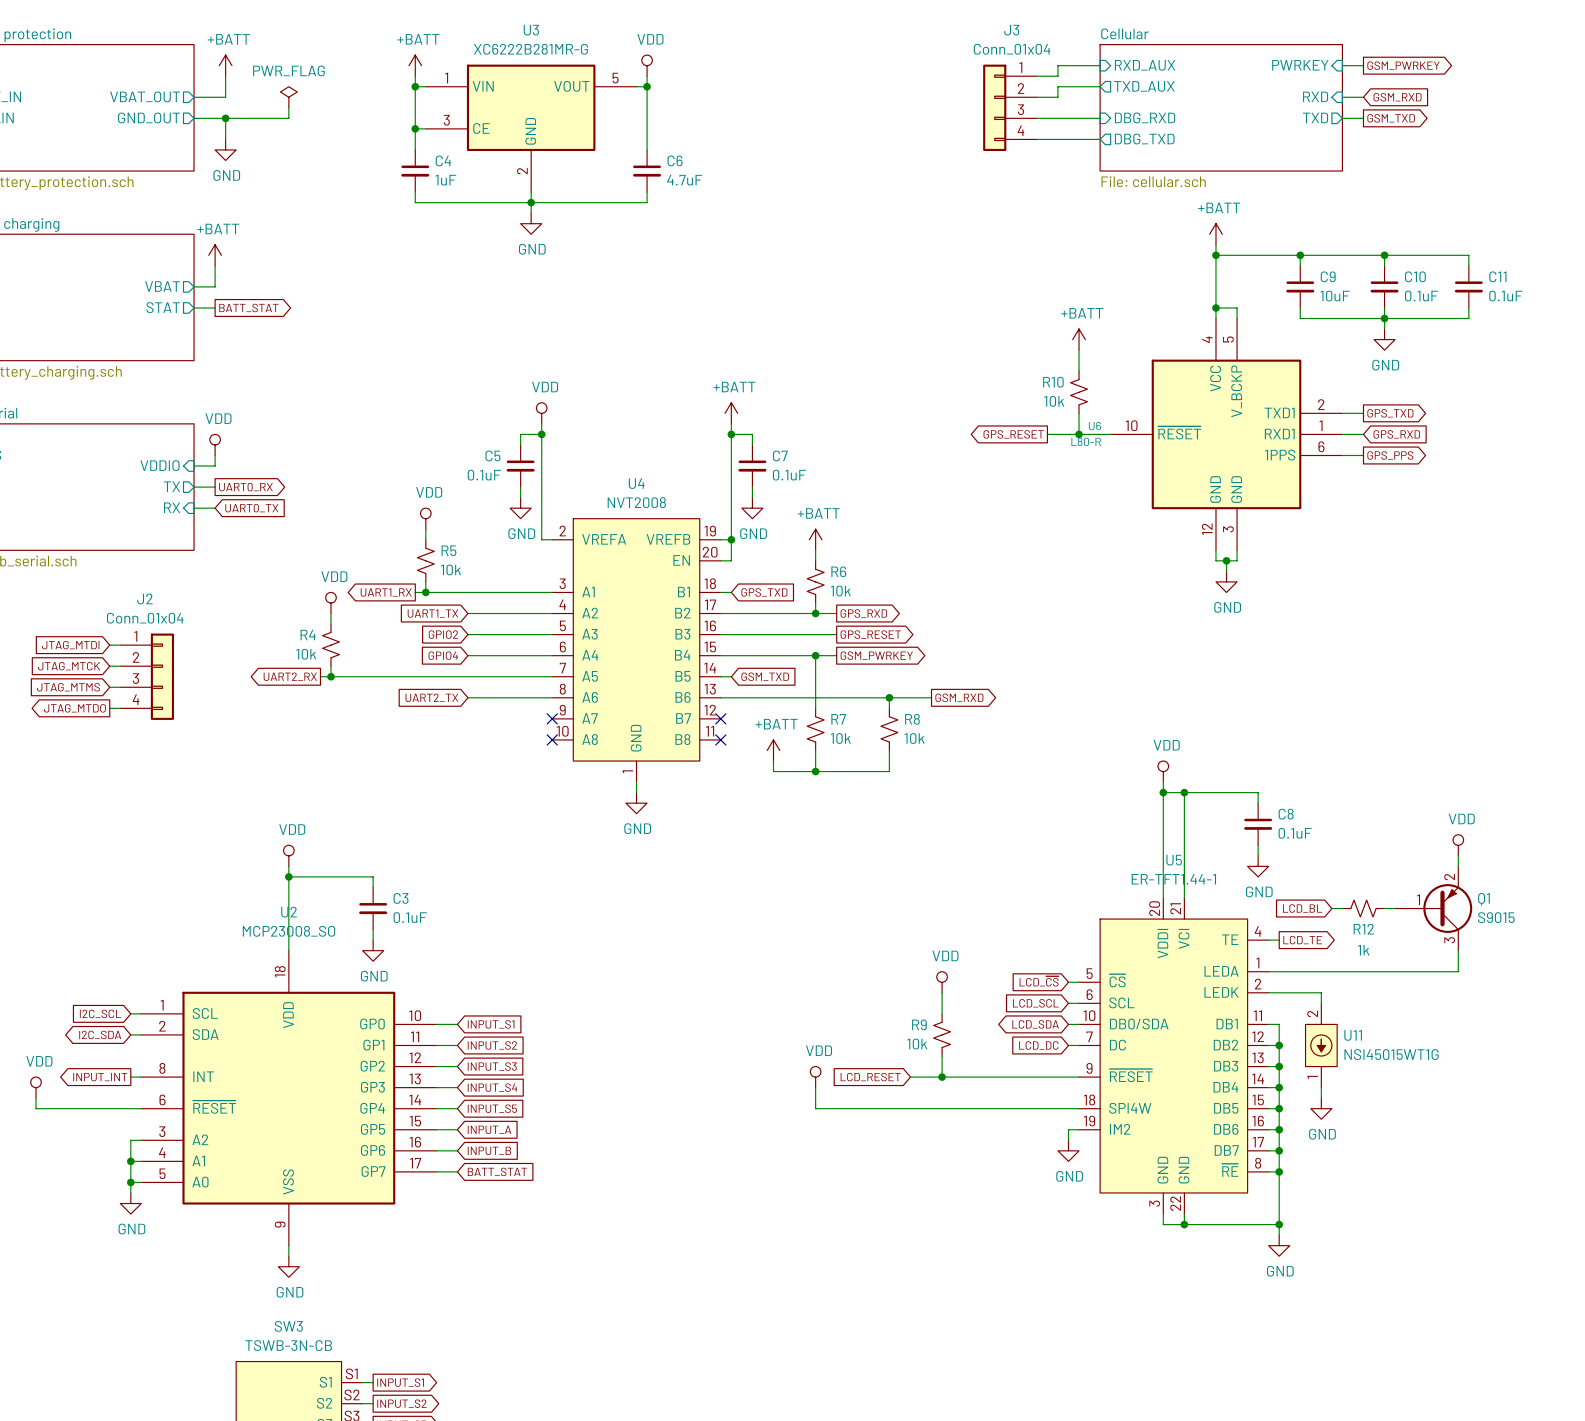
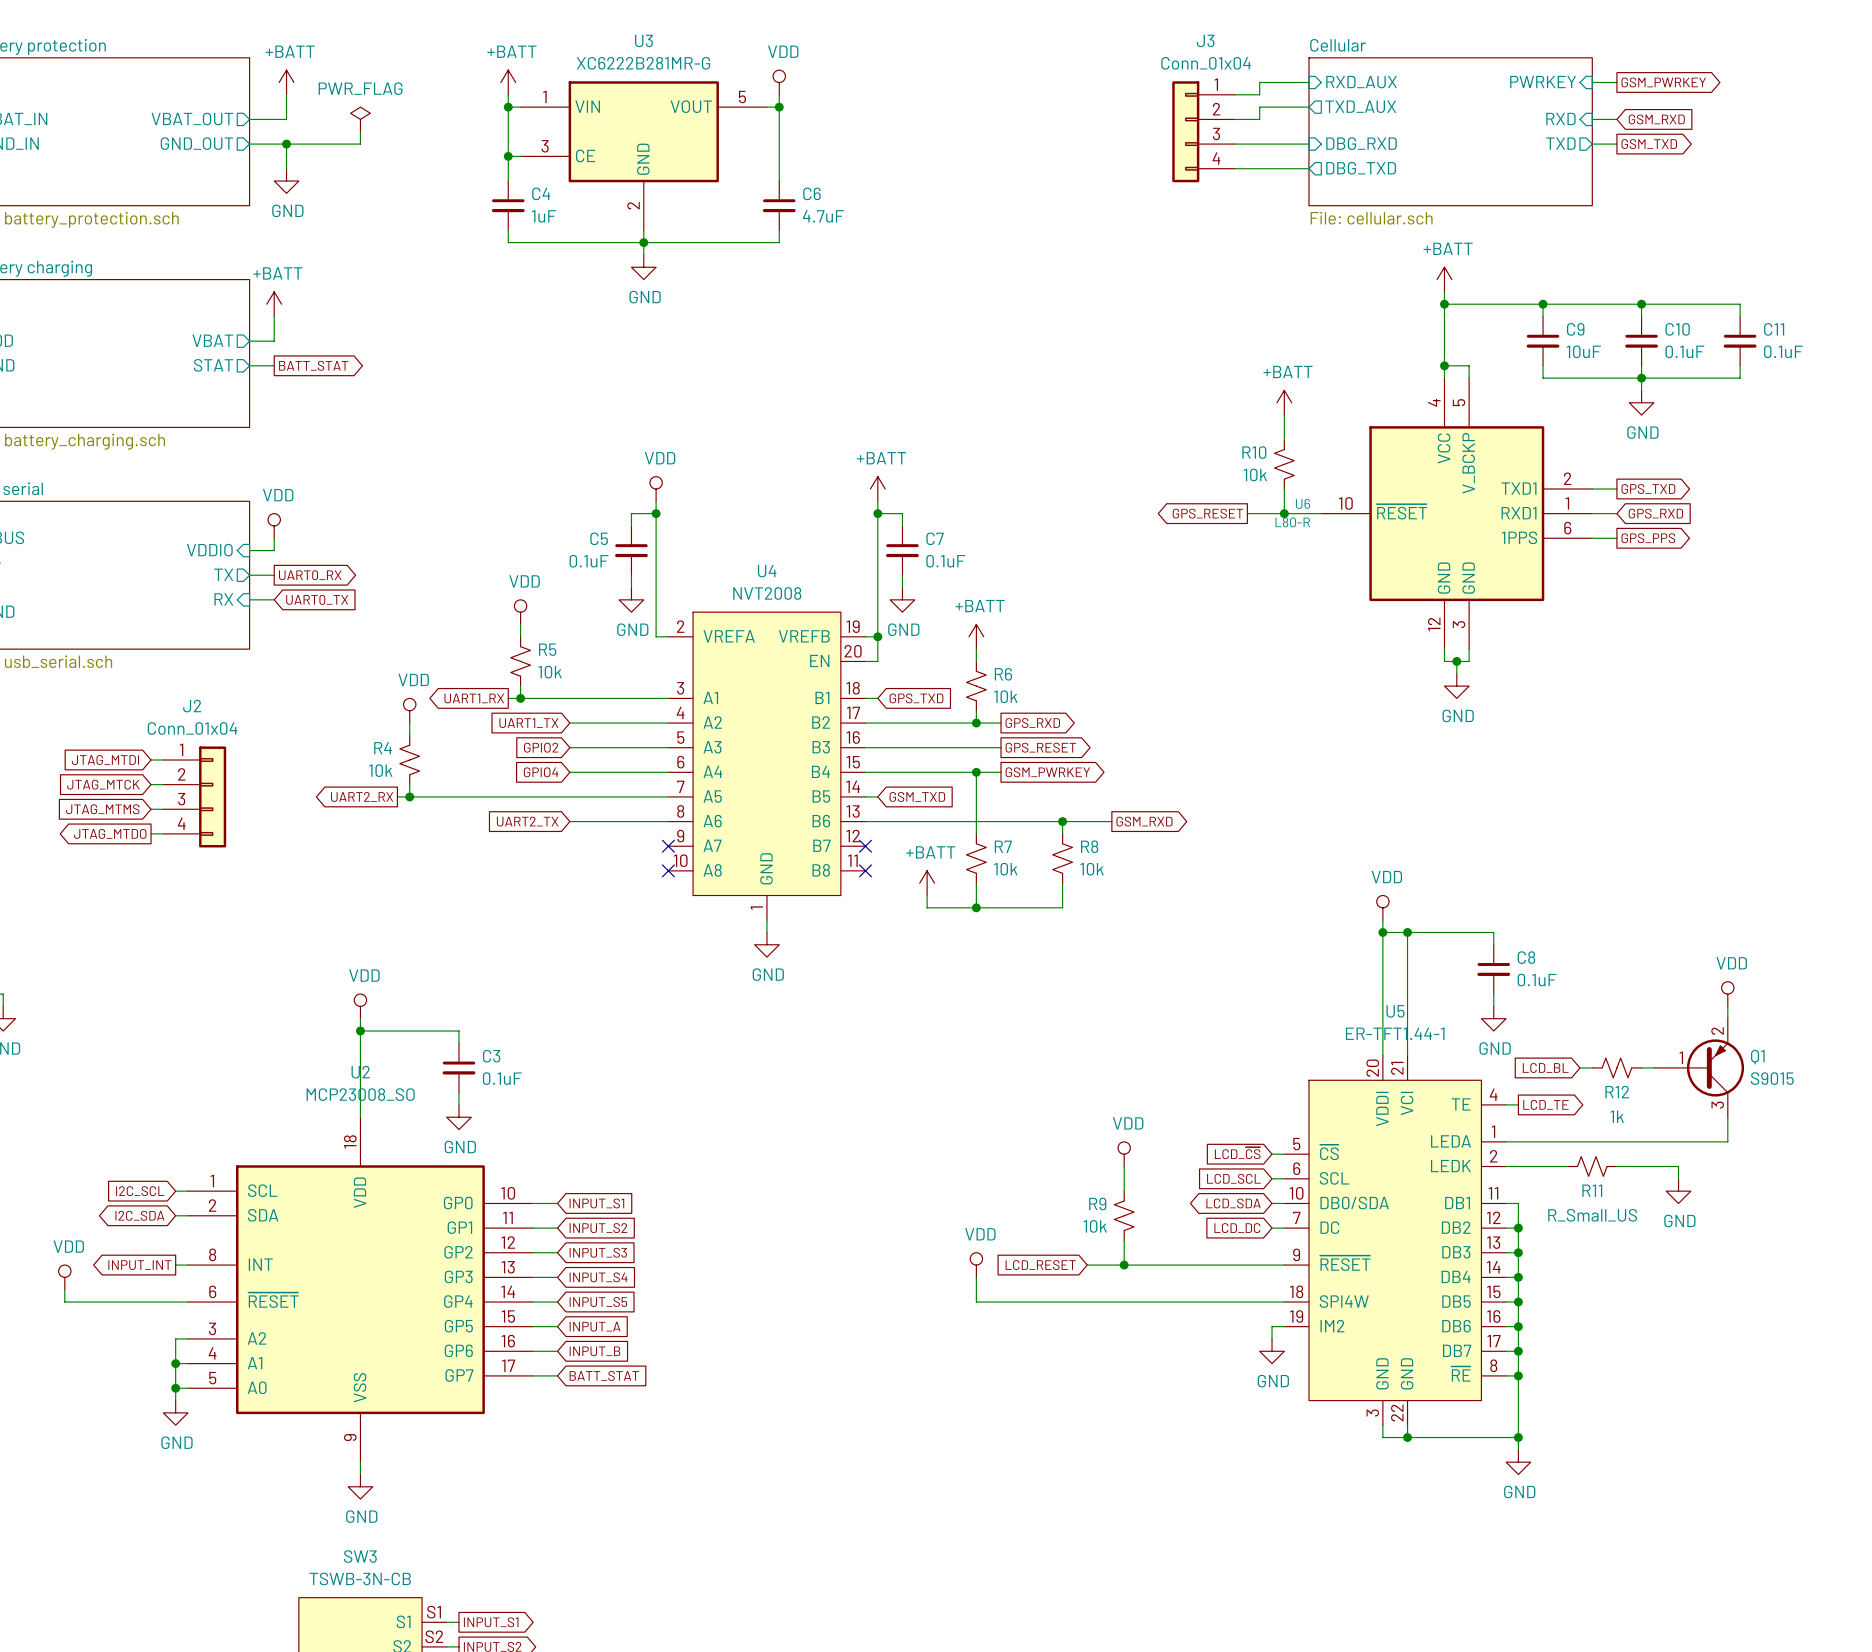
wire: (1321, 992) (1321, 1003) -> none
R11: none -> R_Small_US (1592, 1166)
wire: none -> (1616, 1166) (1678, 1166) (1678, 1178)
U11: NSI45015WT1G (1321, 1045) -> none
wire: (1321, 1087) (1321, 1098) -> none
power symbol position: GND (1321, 1108) -> GND (1678, 1191)

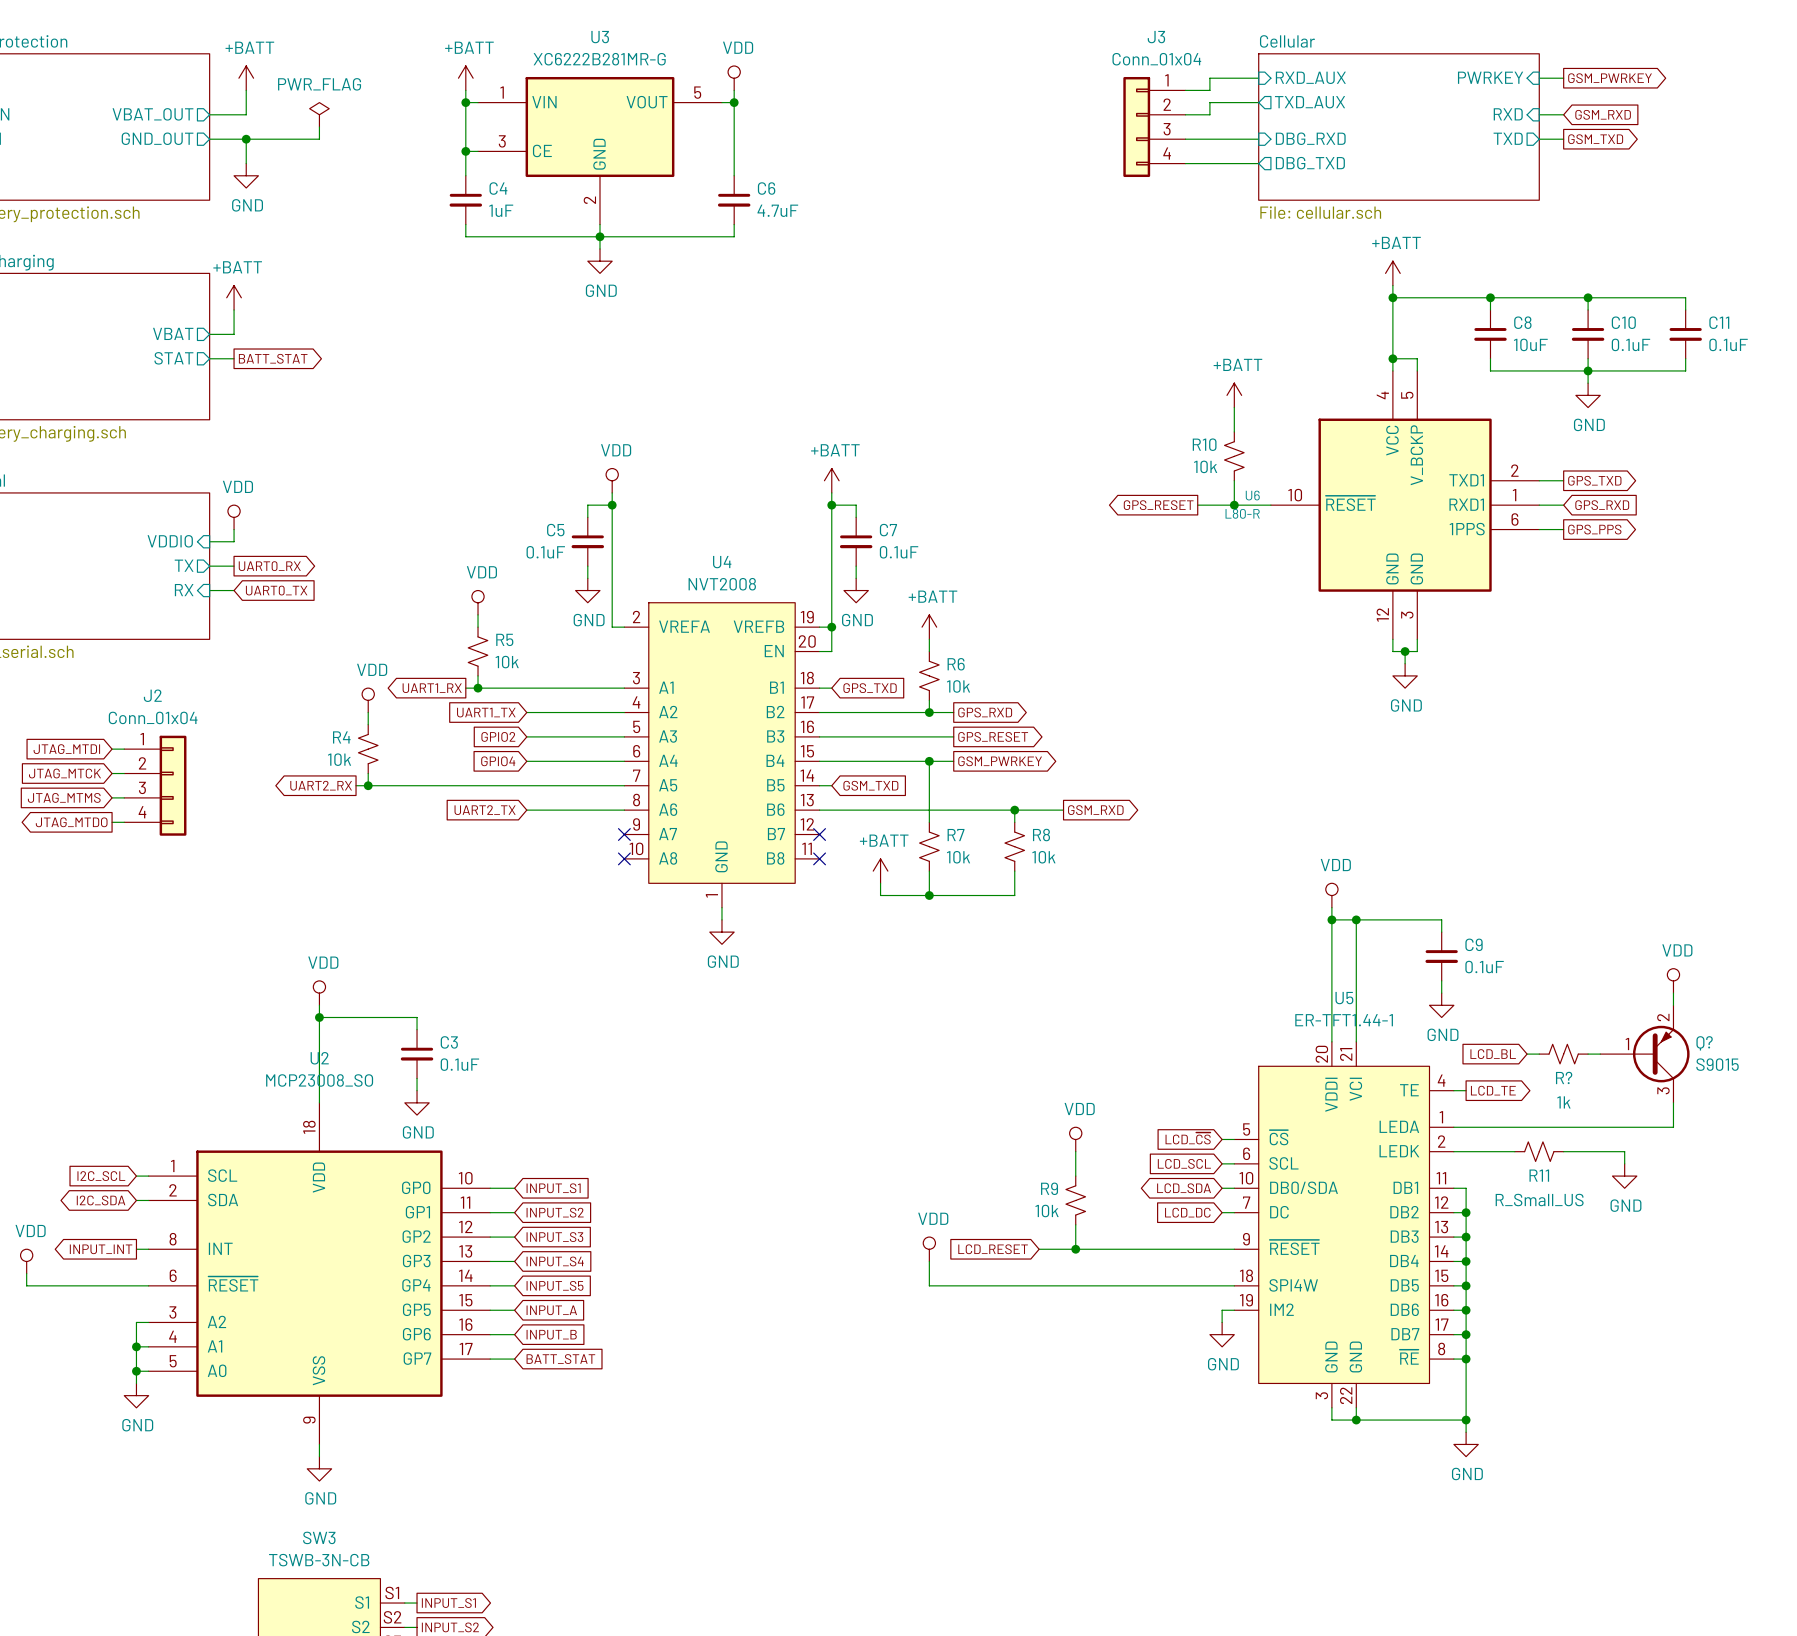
C9 name: C9 (1575, 329) -> C8 (1522, 322)
C8 name: C8 (1526, 957) -> C9 (1474, 944)
Q1 name: Q1 (1757, 1057) -> Q? (1704, 1043)
R12 name: R12 (1617, 1092) -> R? (1564, 1077)

